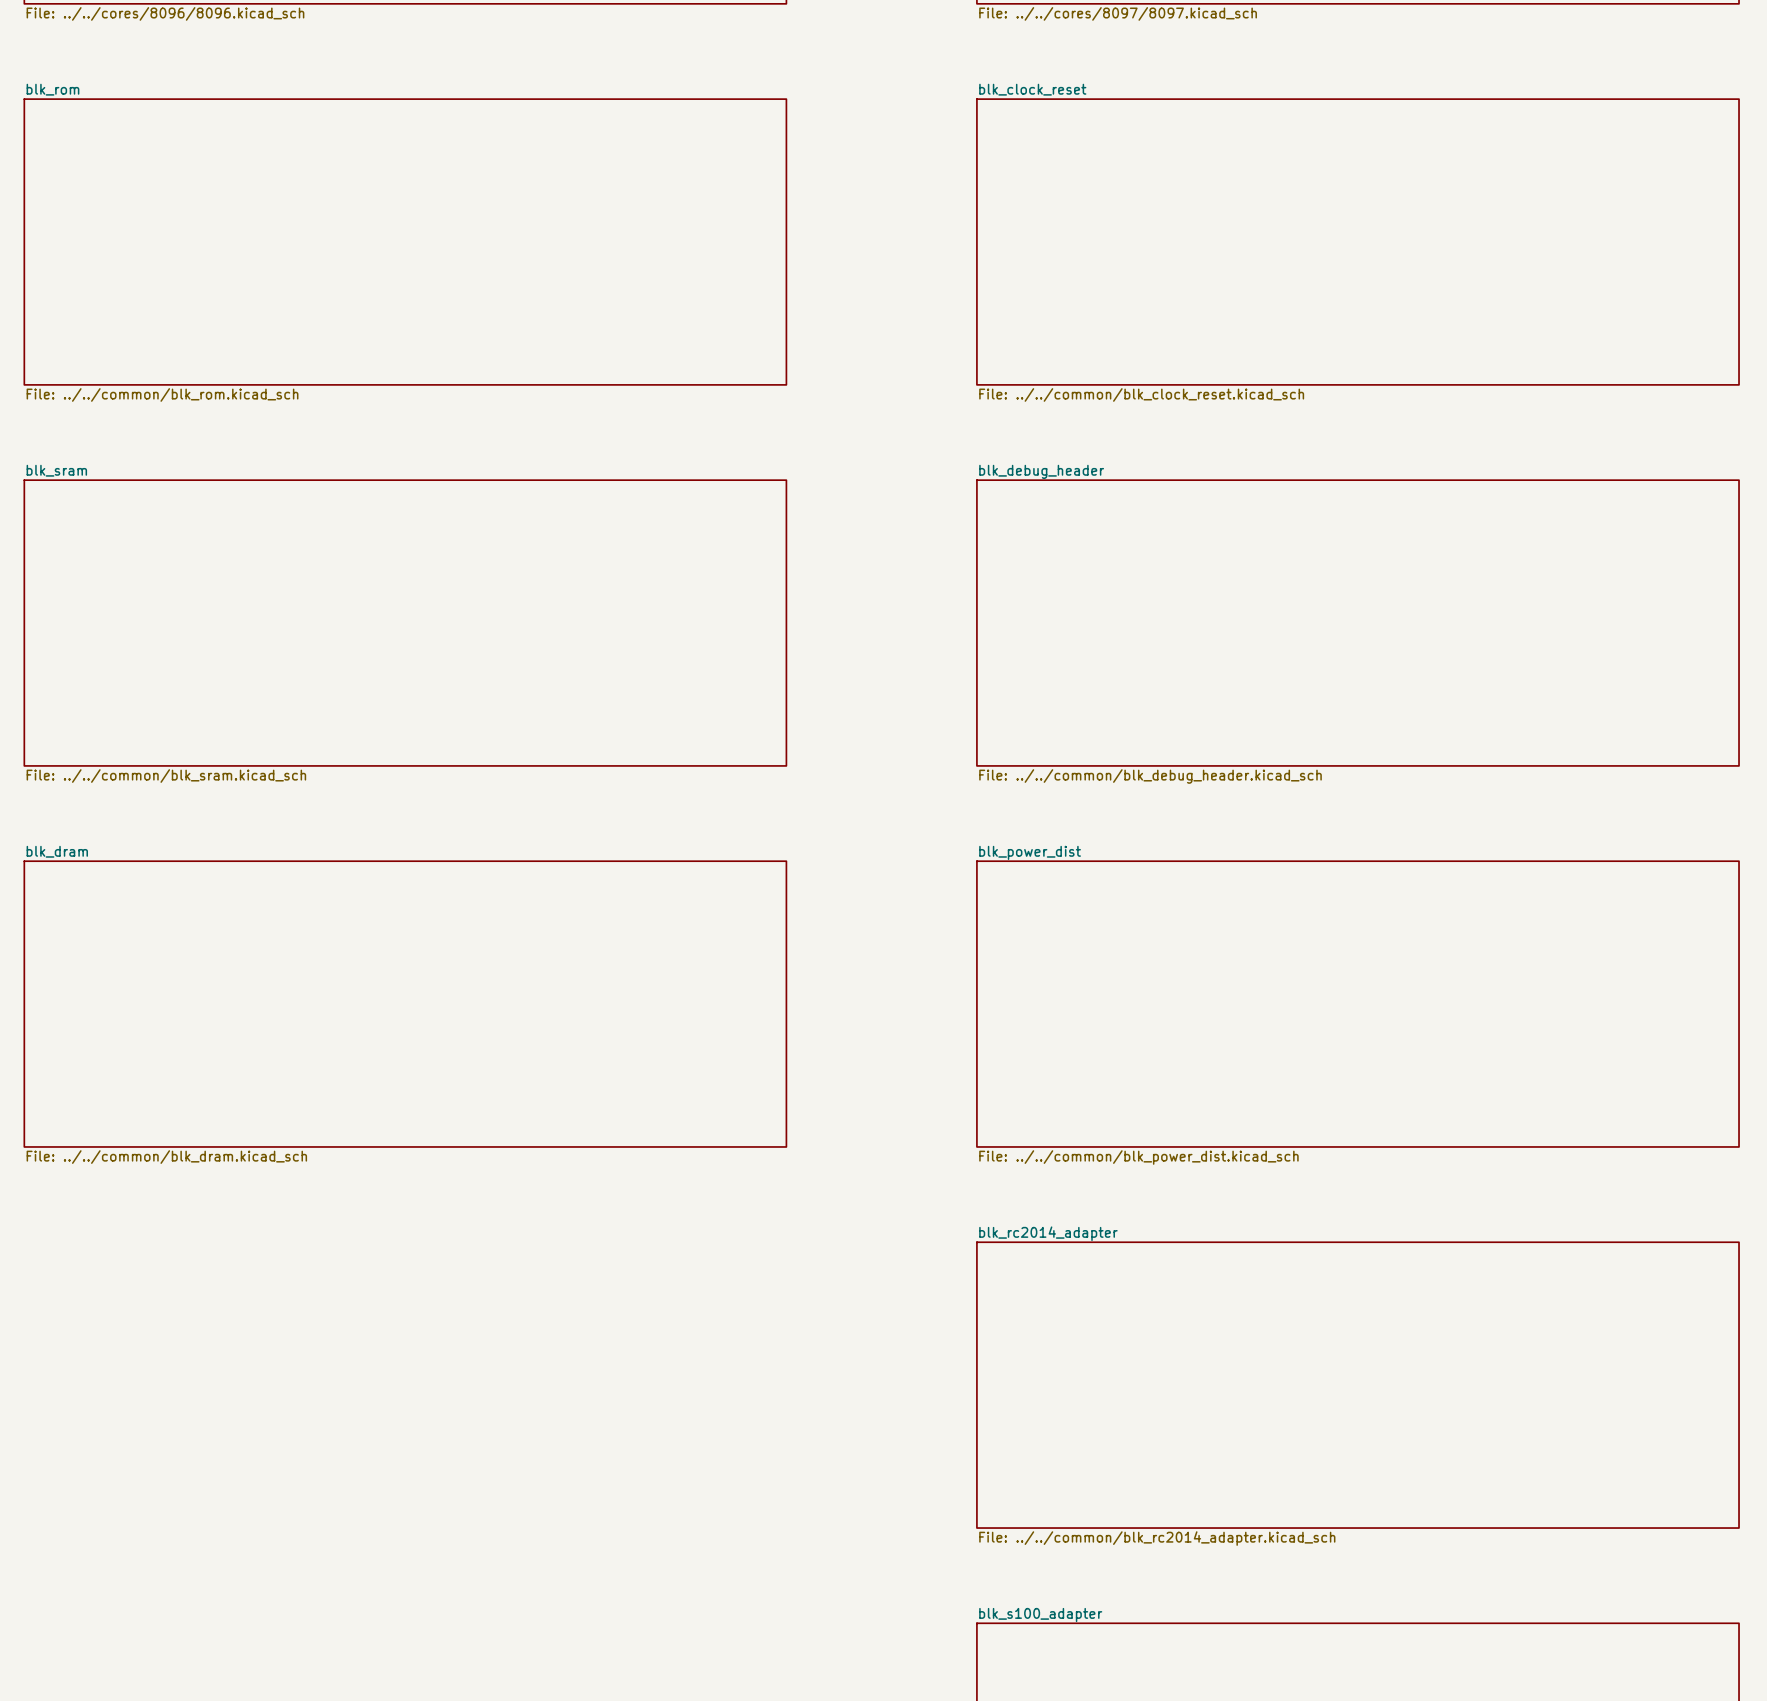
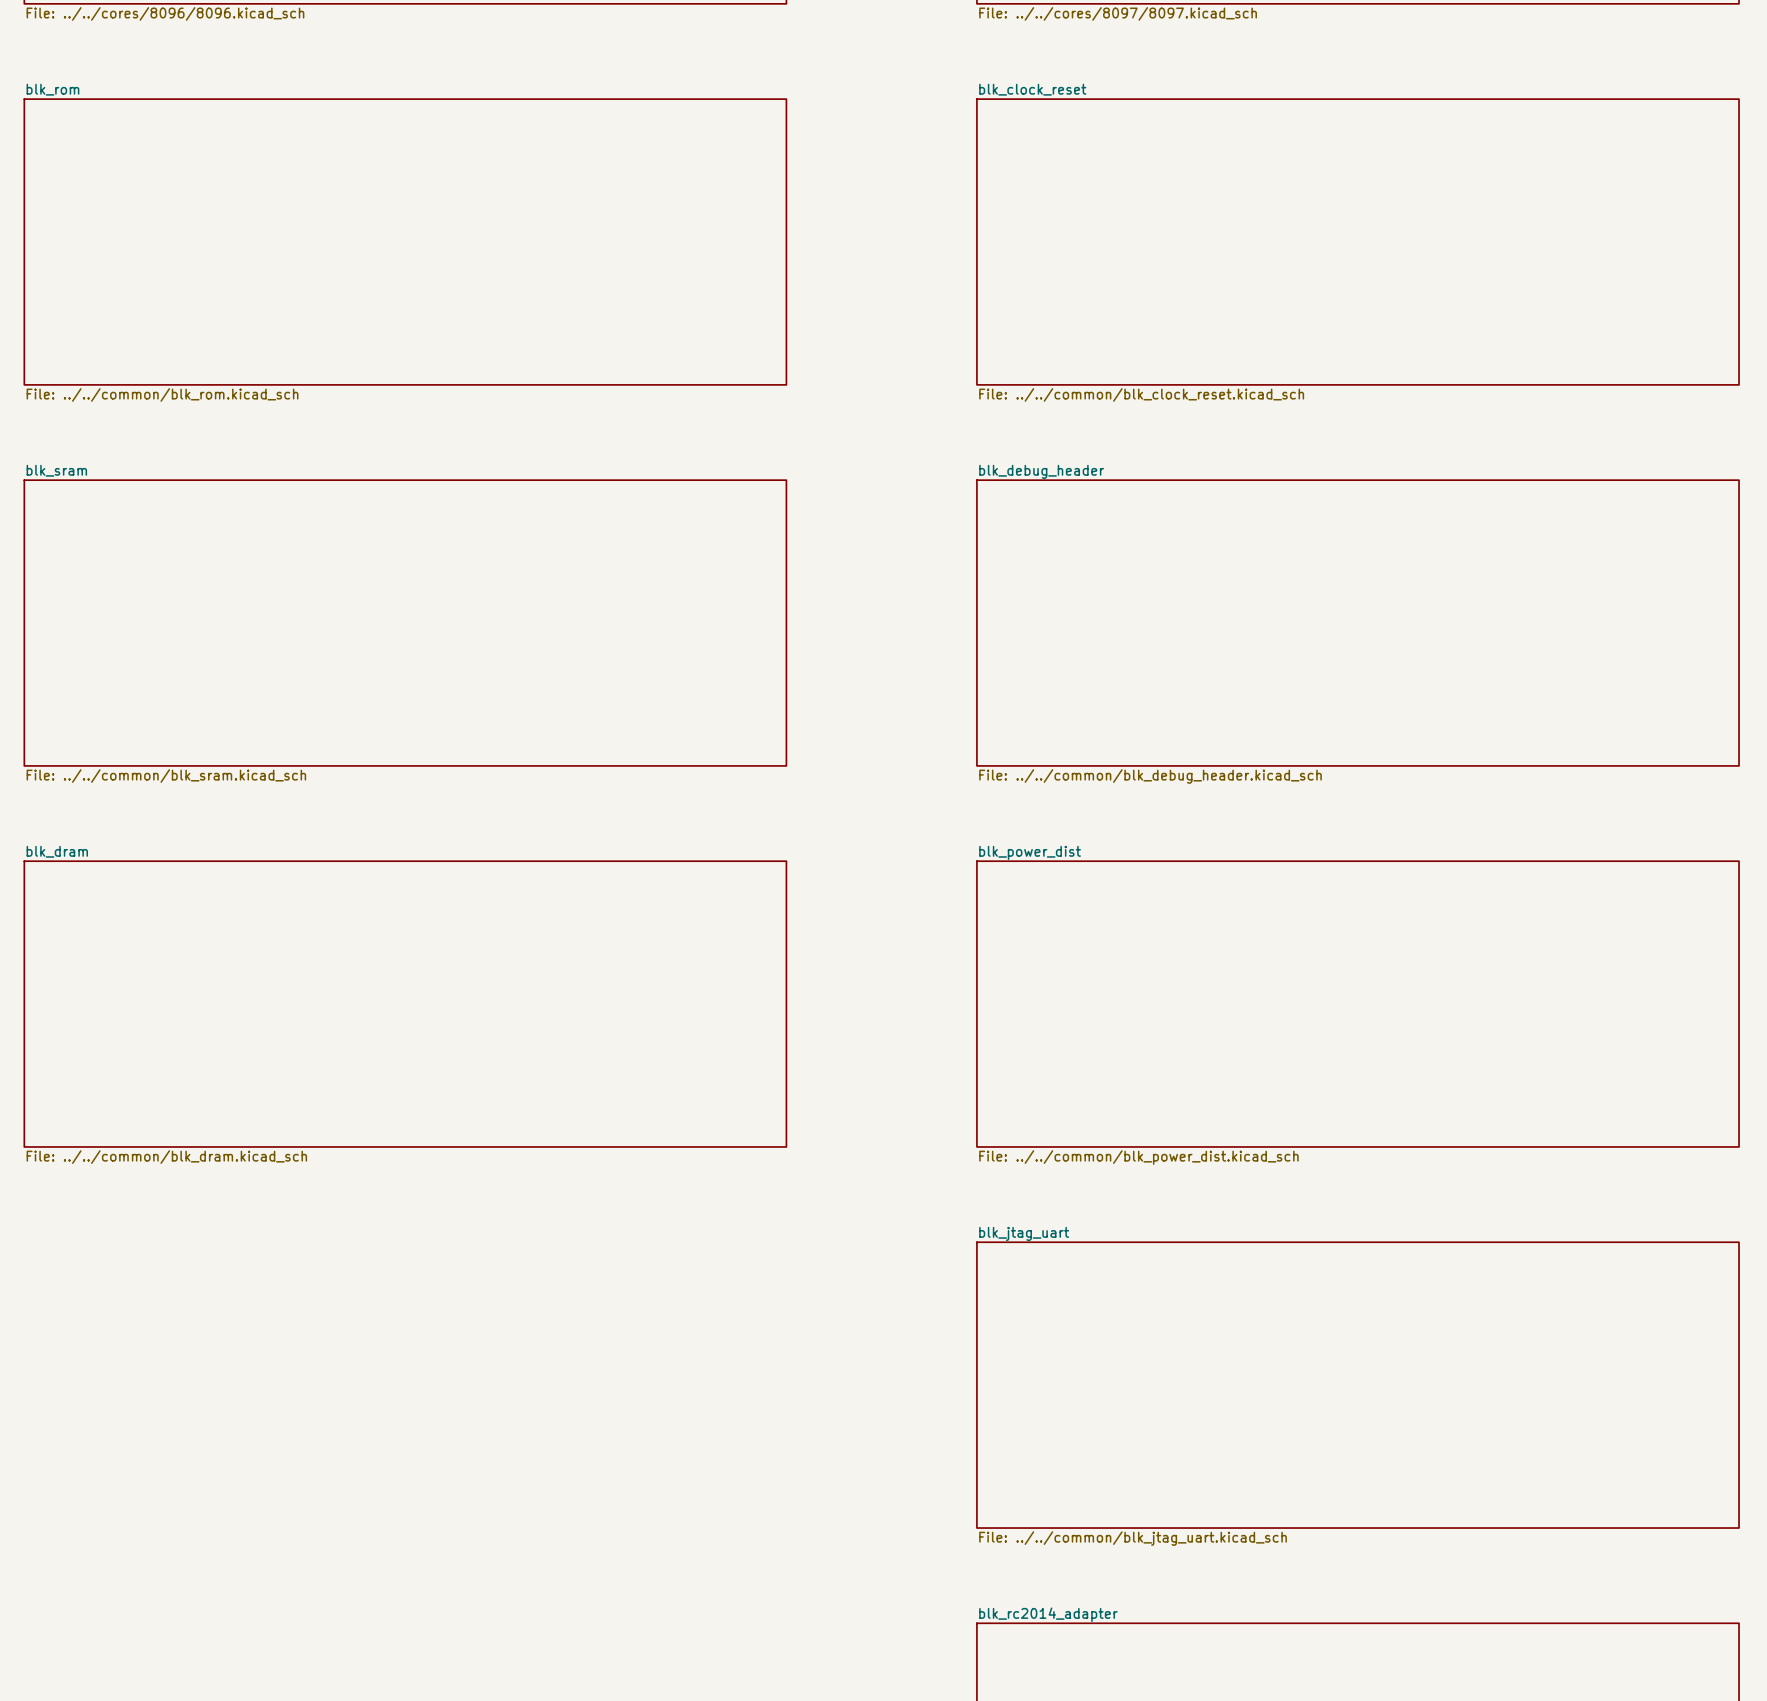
sheet blk_rc2014_adapter name: blk_rc2014_adapter (1048, 1233) -> blk_jtag_uart (1024, 1233)
sheet blk_rc2014_adapter value: File: ../../common/blk_rc2014_adapter.kicad_sch (1157, 1538) -> File: ../../common/blk_jtag_uart.kicad_sch (1133, 1538)
sheet blk_s100_adapter name: blk_s100_adapter (1040, 1614) -> blk_rc2014_adapter (1048, 1614)

